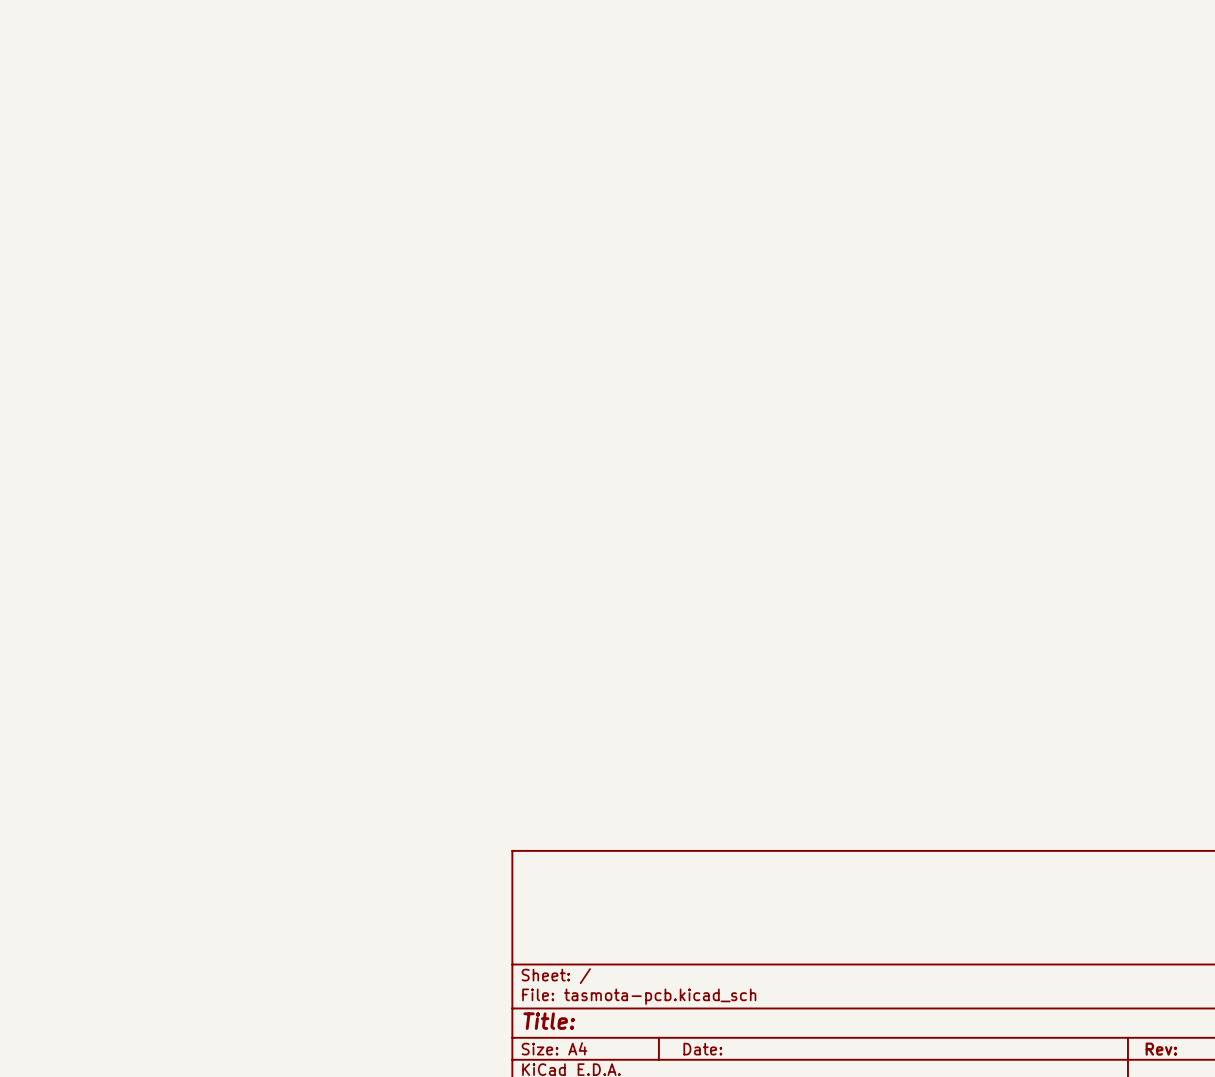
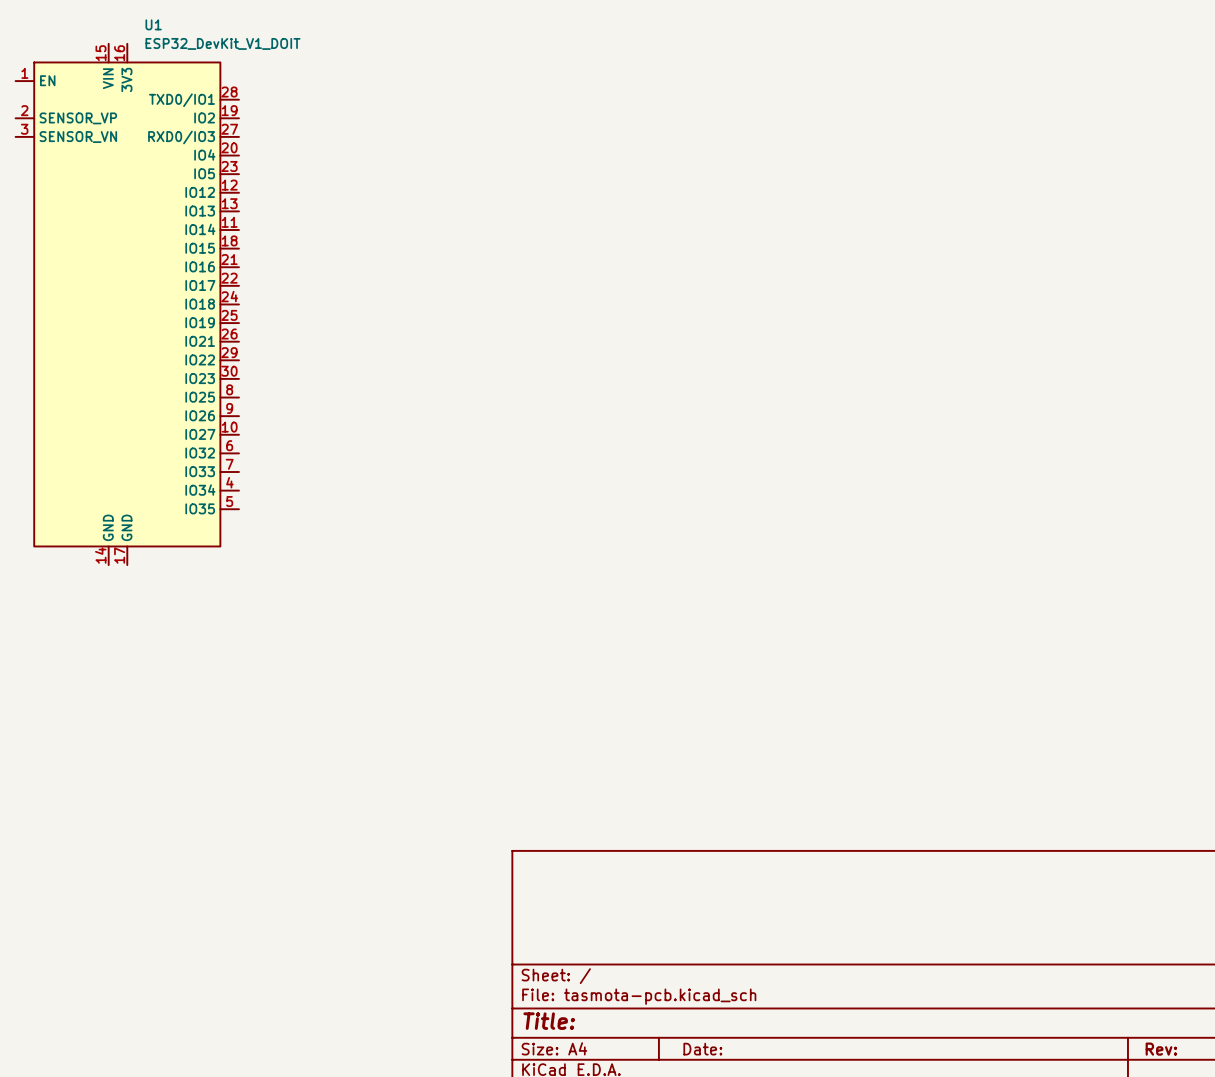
U1: none -> ESP32_DevKit_V1_DOIT (127, 304)

